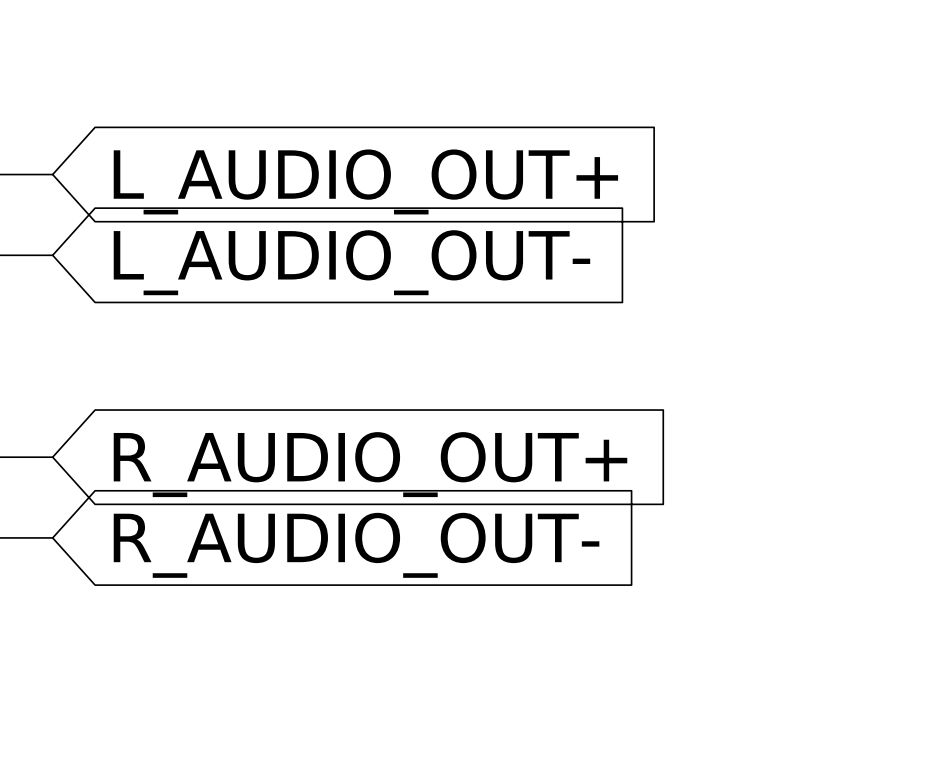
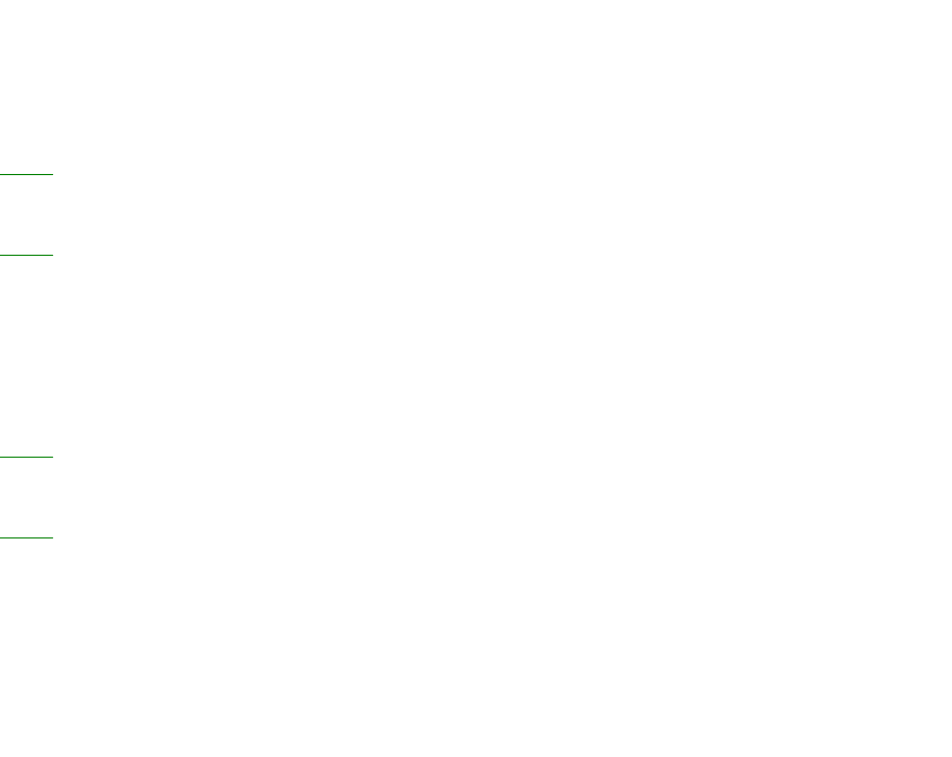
global label: L_AUDIO_OUT+ (365, 181) -> none
global label: L_AUDIO_OUT- (351, 262) -> none
global label: R_AUDIO_OUT+ (370, 464) -> none
global label: R_AUDIO_OUT- (356, 545) -> none

